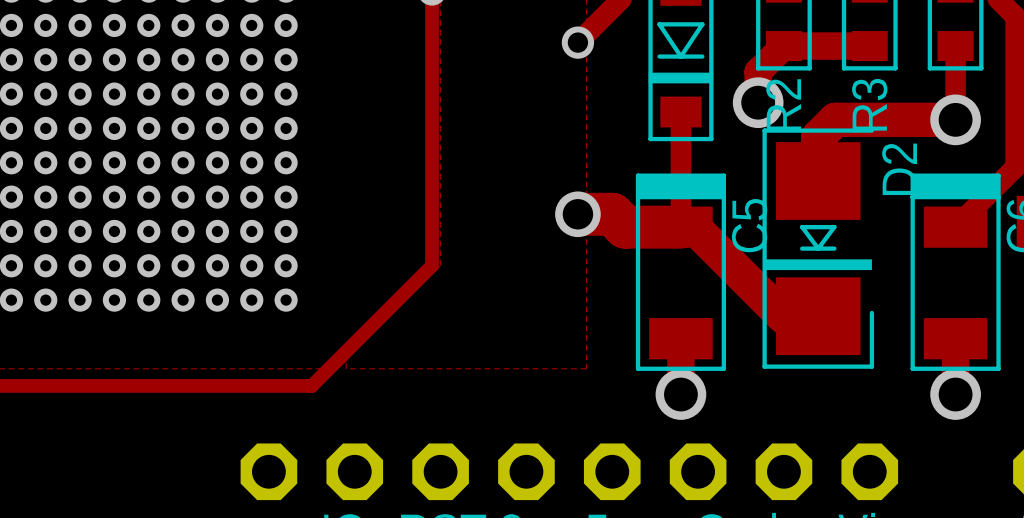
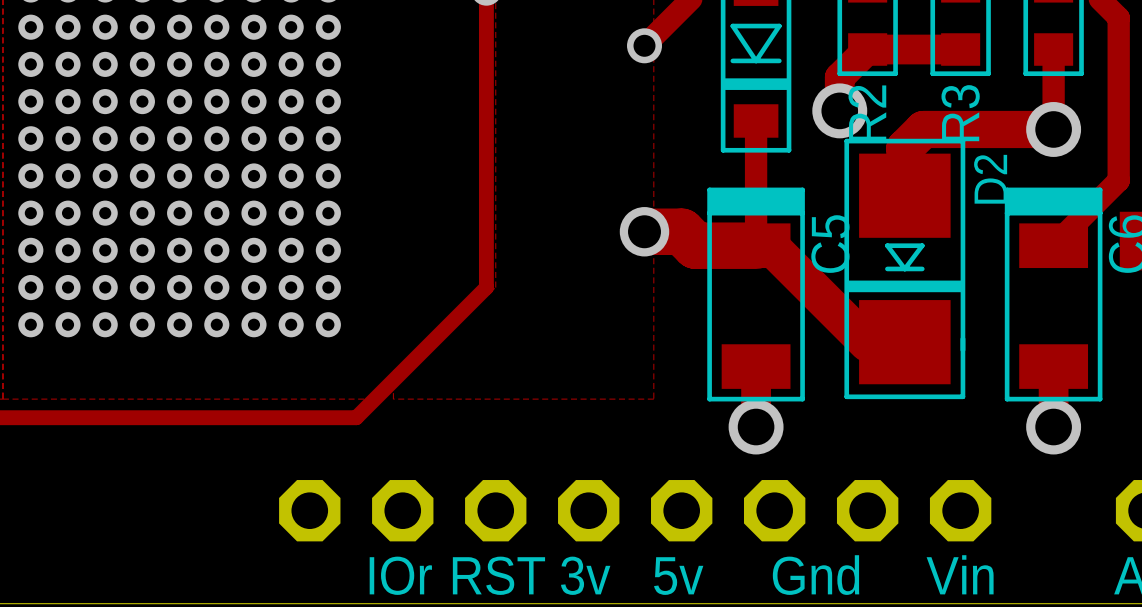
D2 footprint: [762, 128, 875, 369] -> [844, 138, 966, 400]

